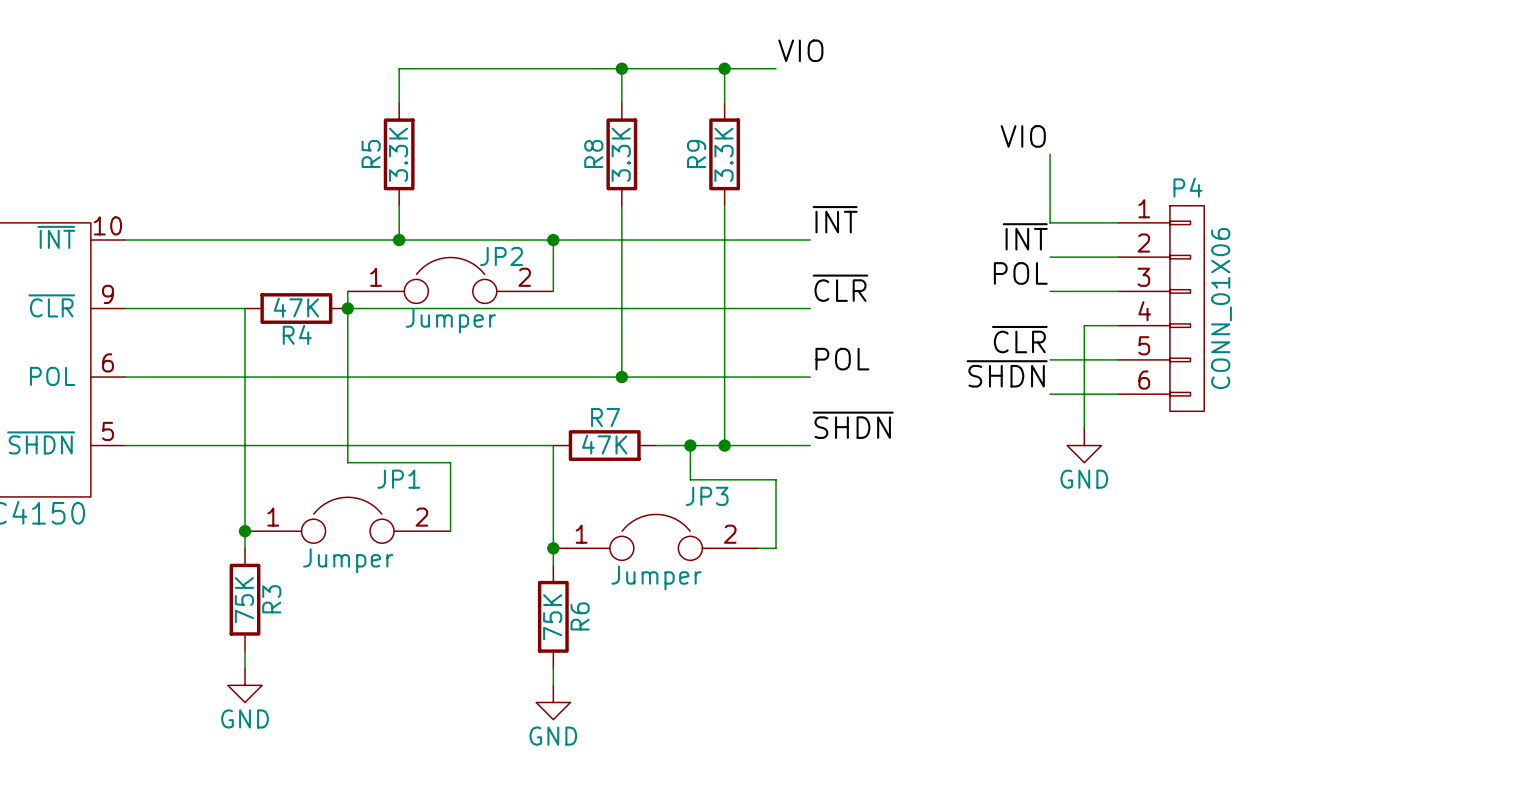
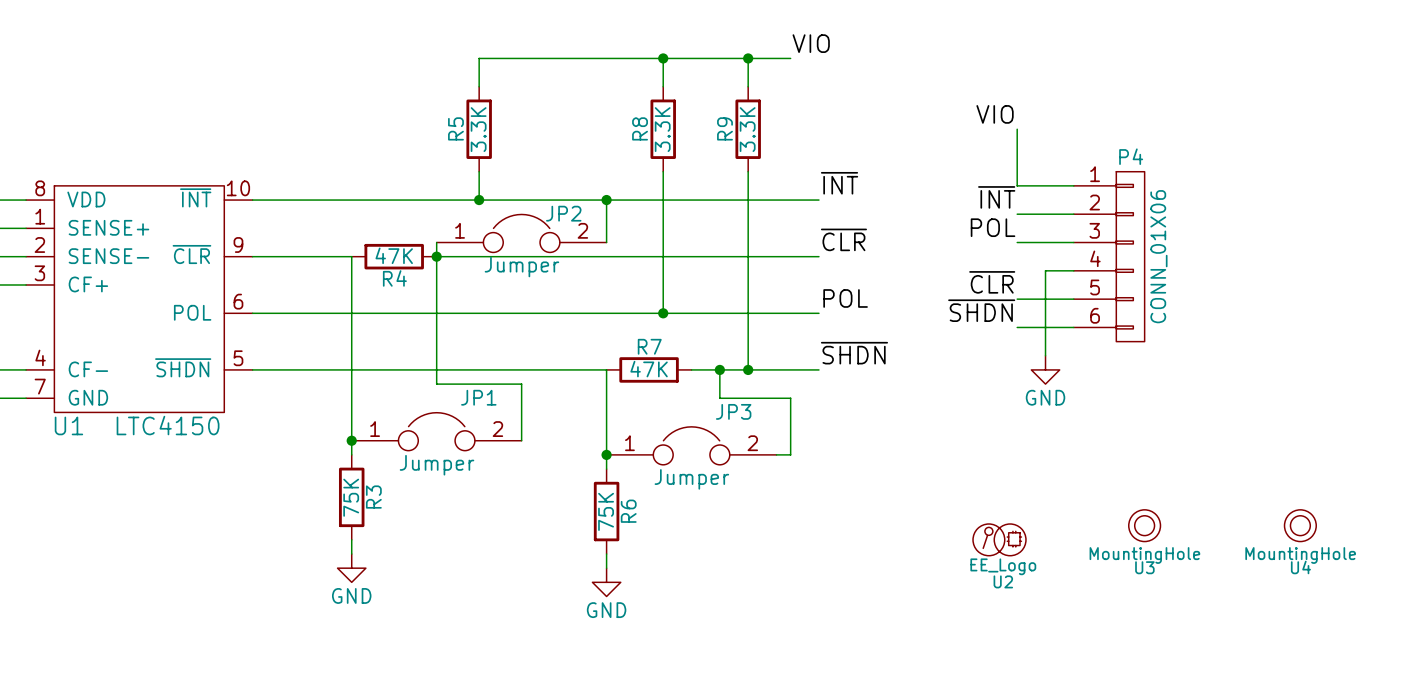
U3: none -> MountingHole (1144, 525)
U4: none -> MountingHole (1300, 525)
U2: none -> EE_Logo (999, 539)

